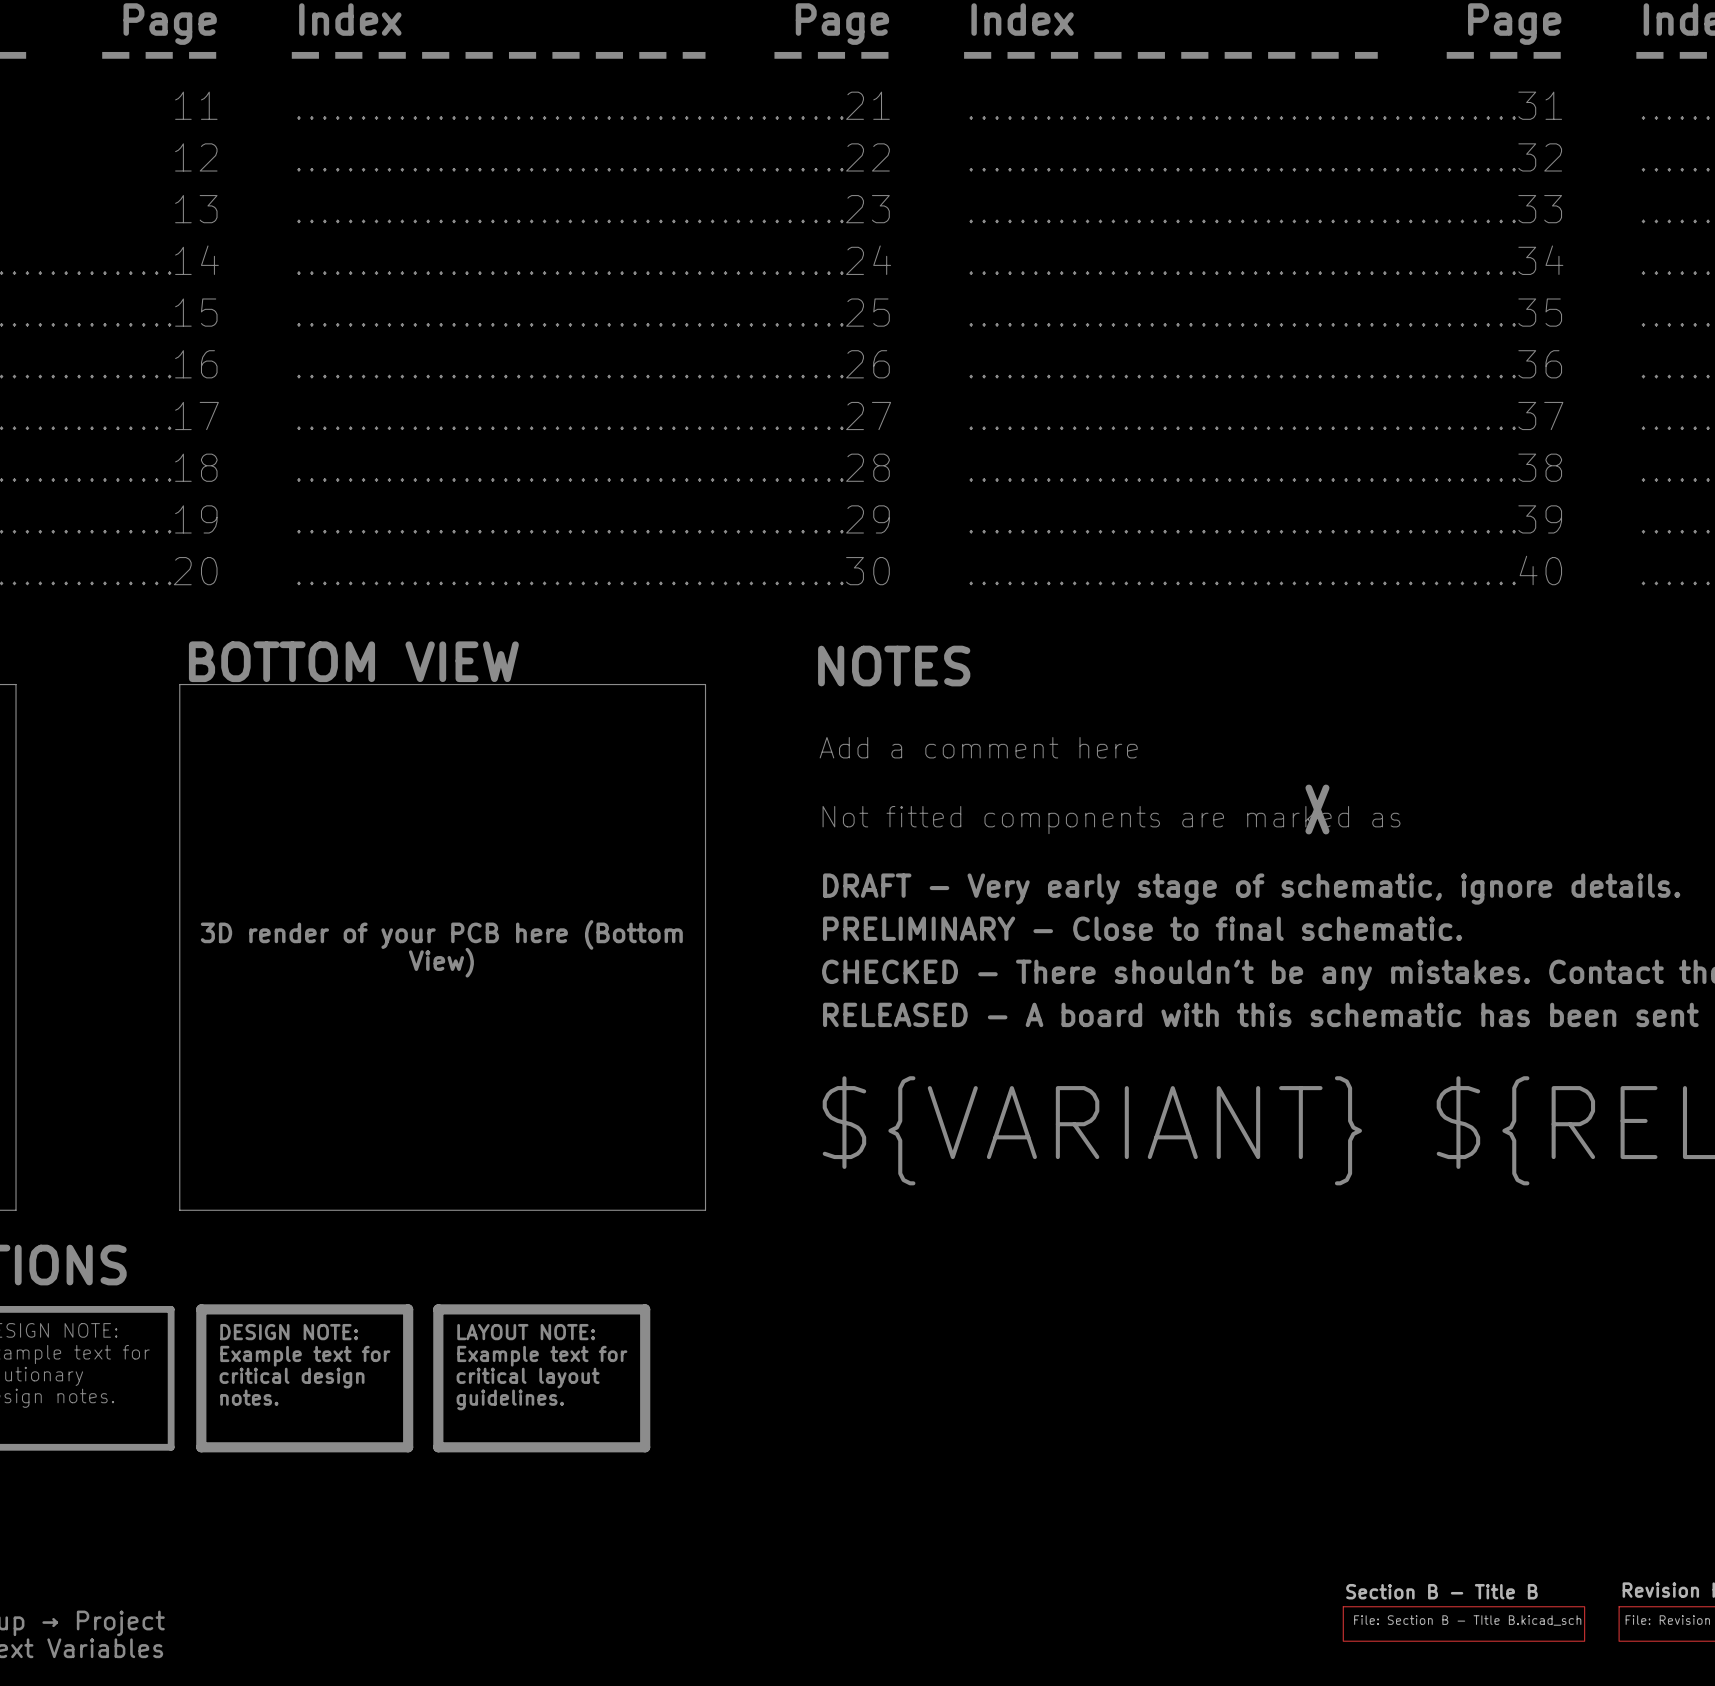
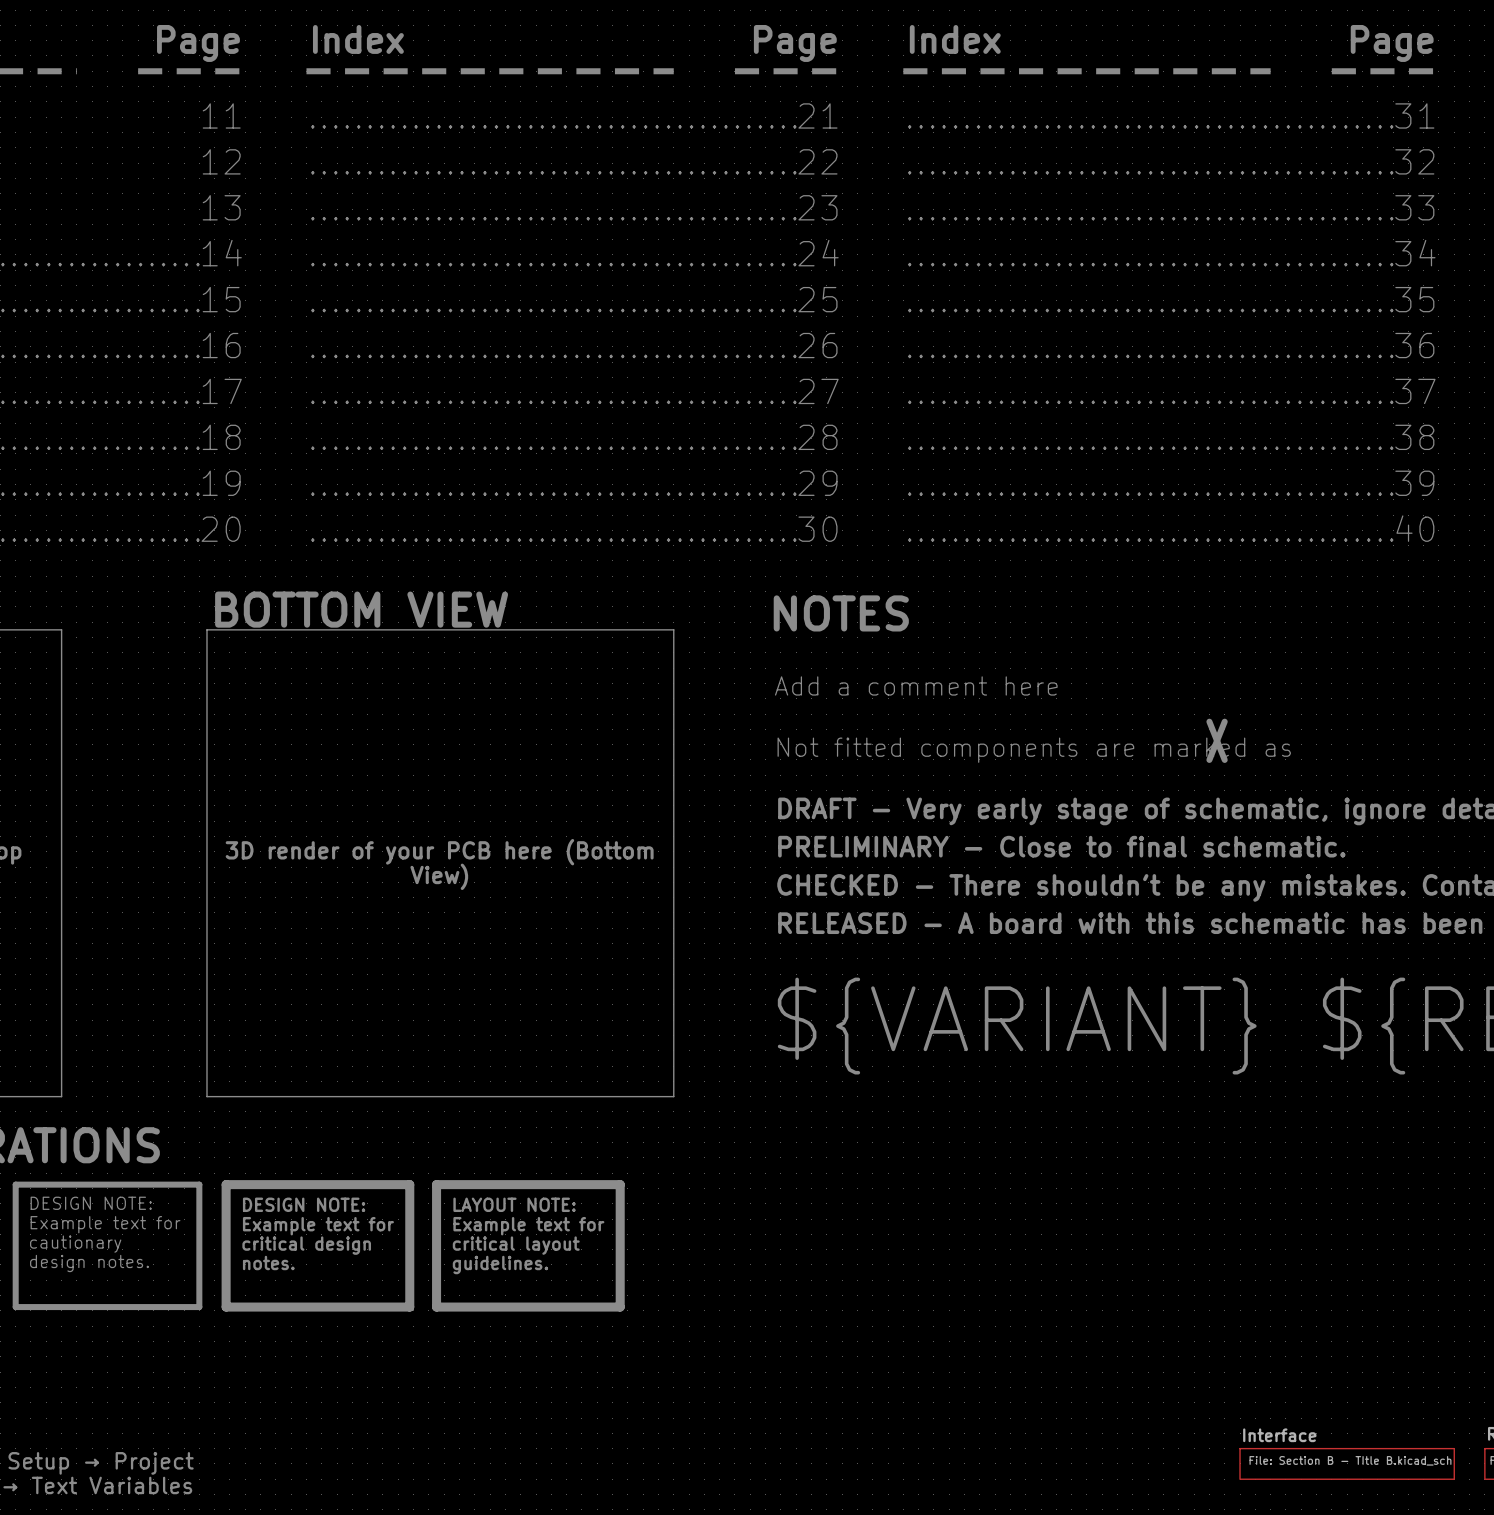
sheet Section B - Title B name: Section B - Title B (1441, 1591) -> Interface (1279, 1435)

